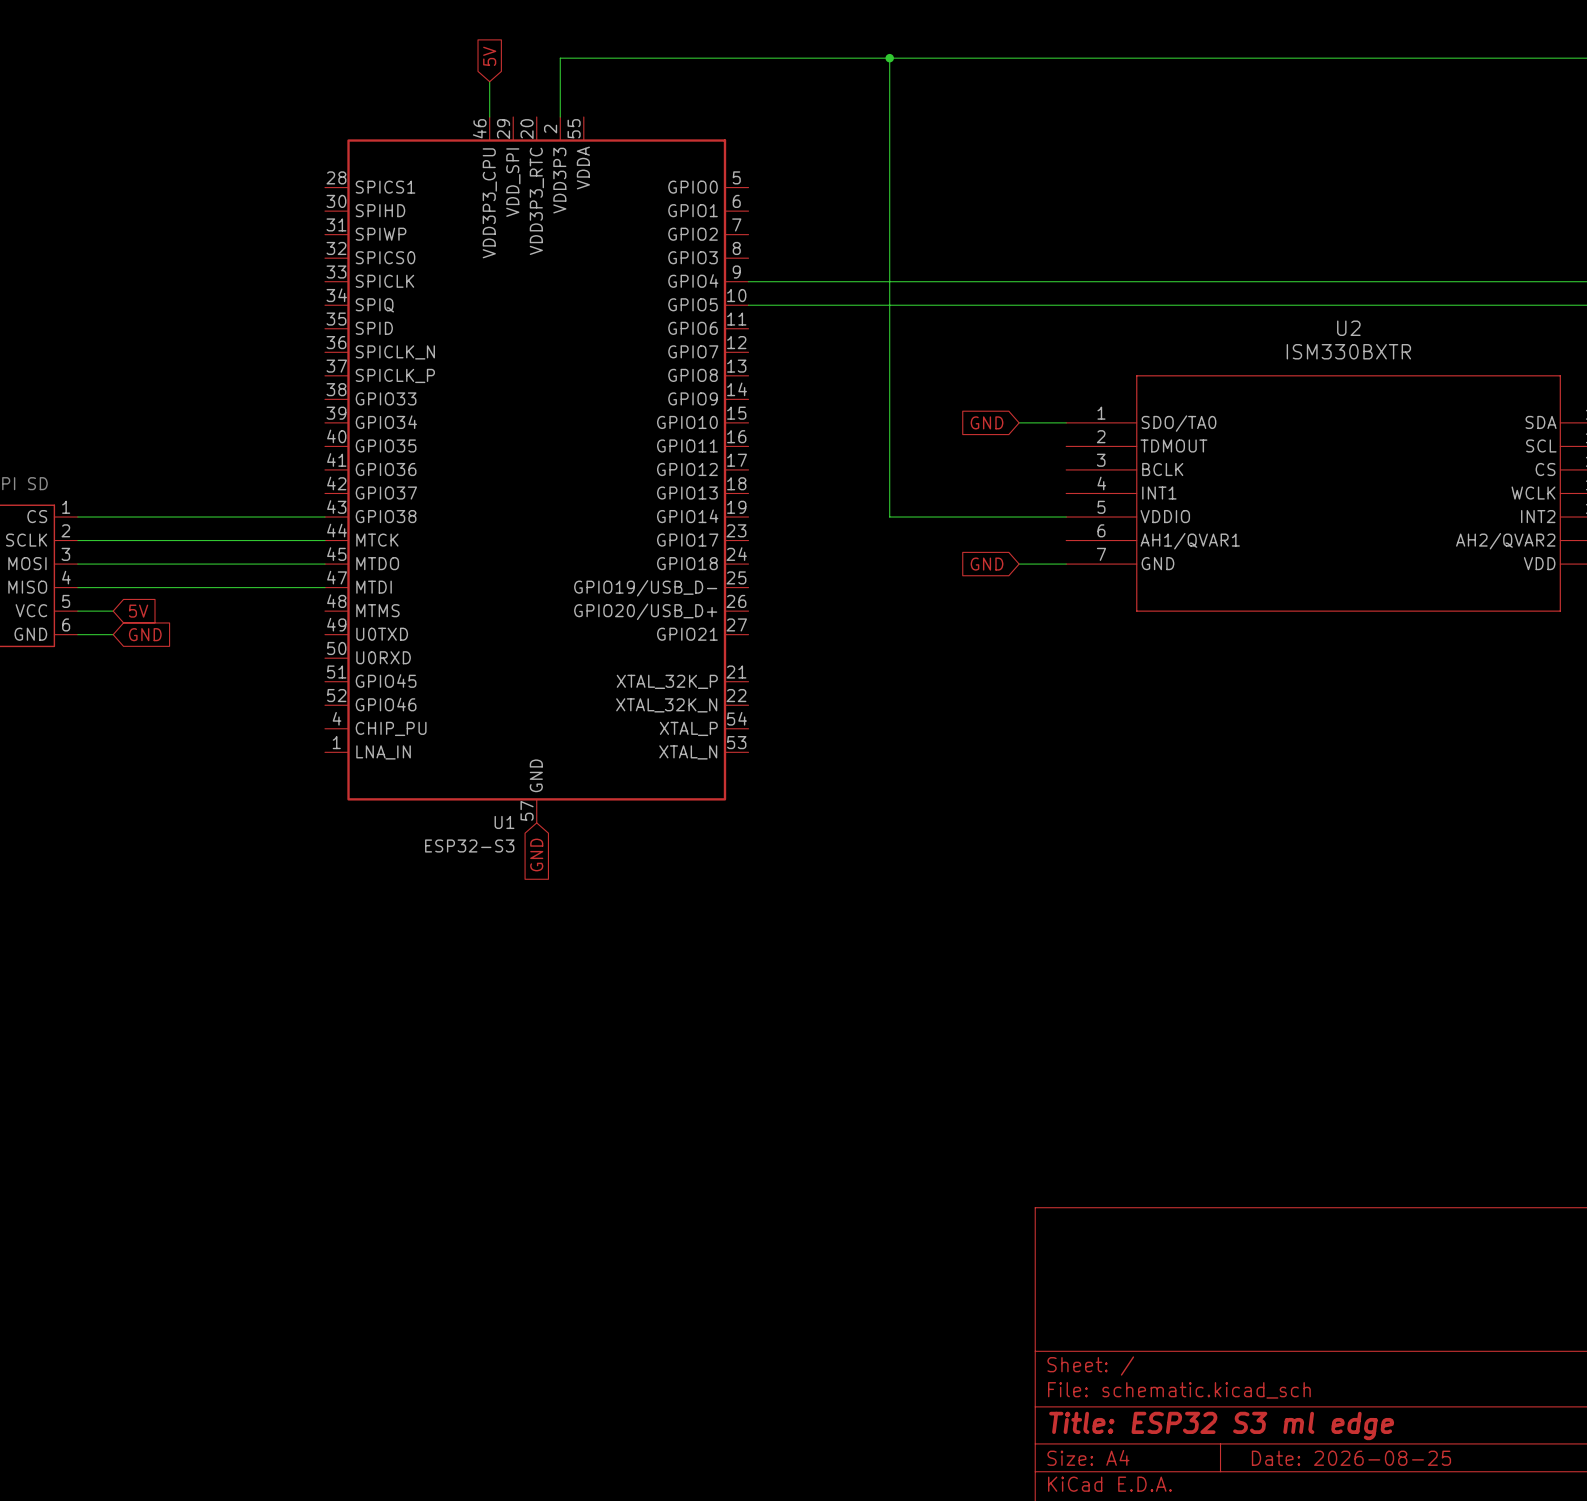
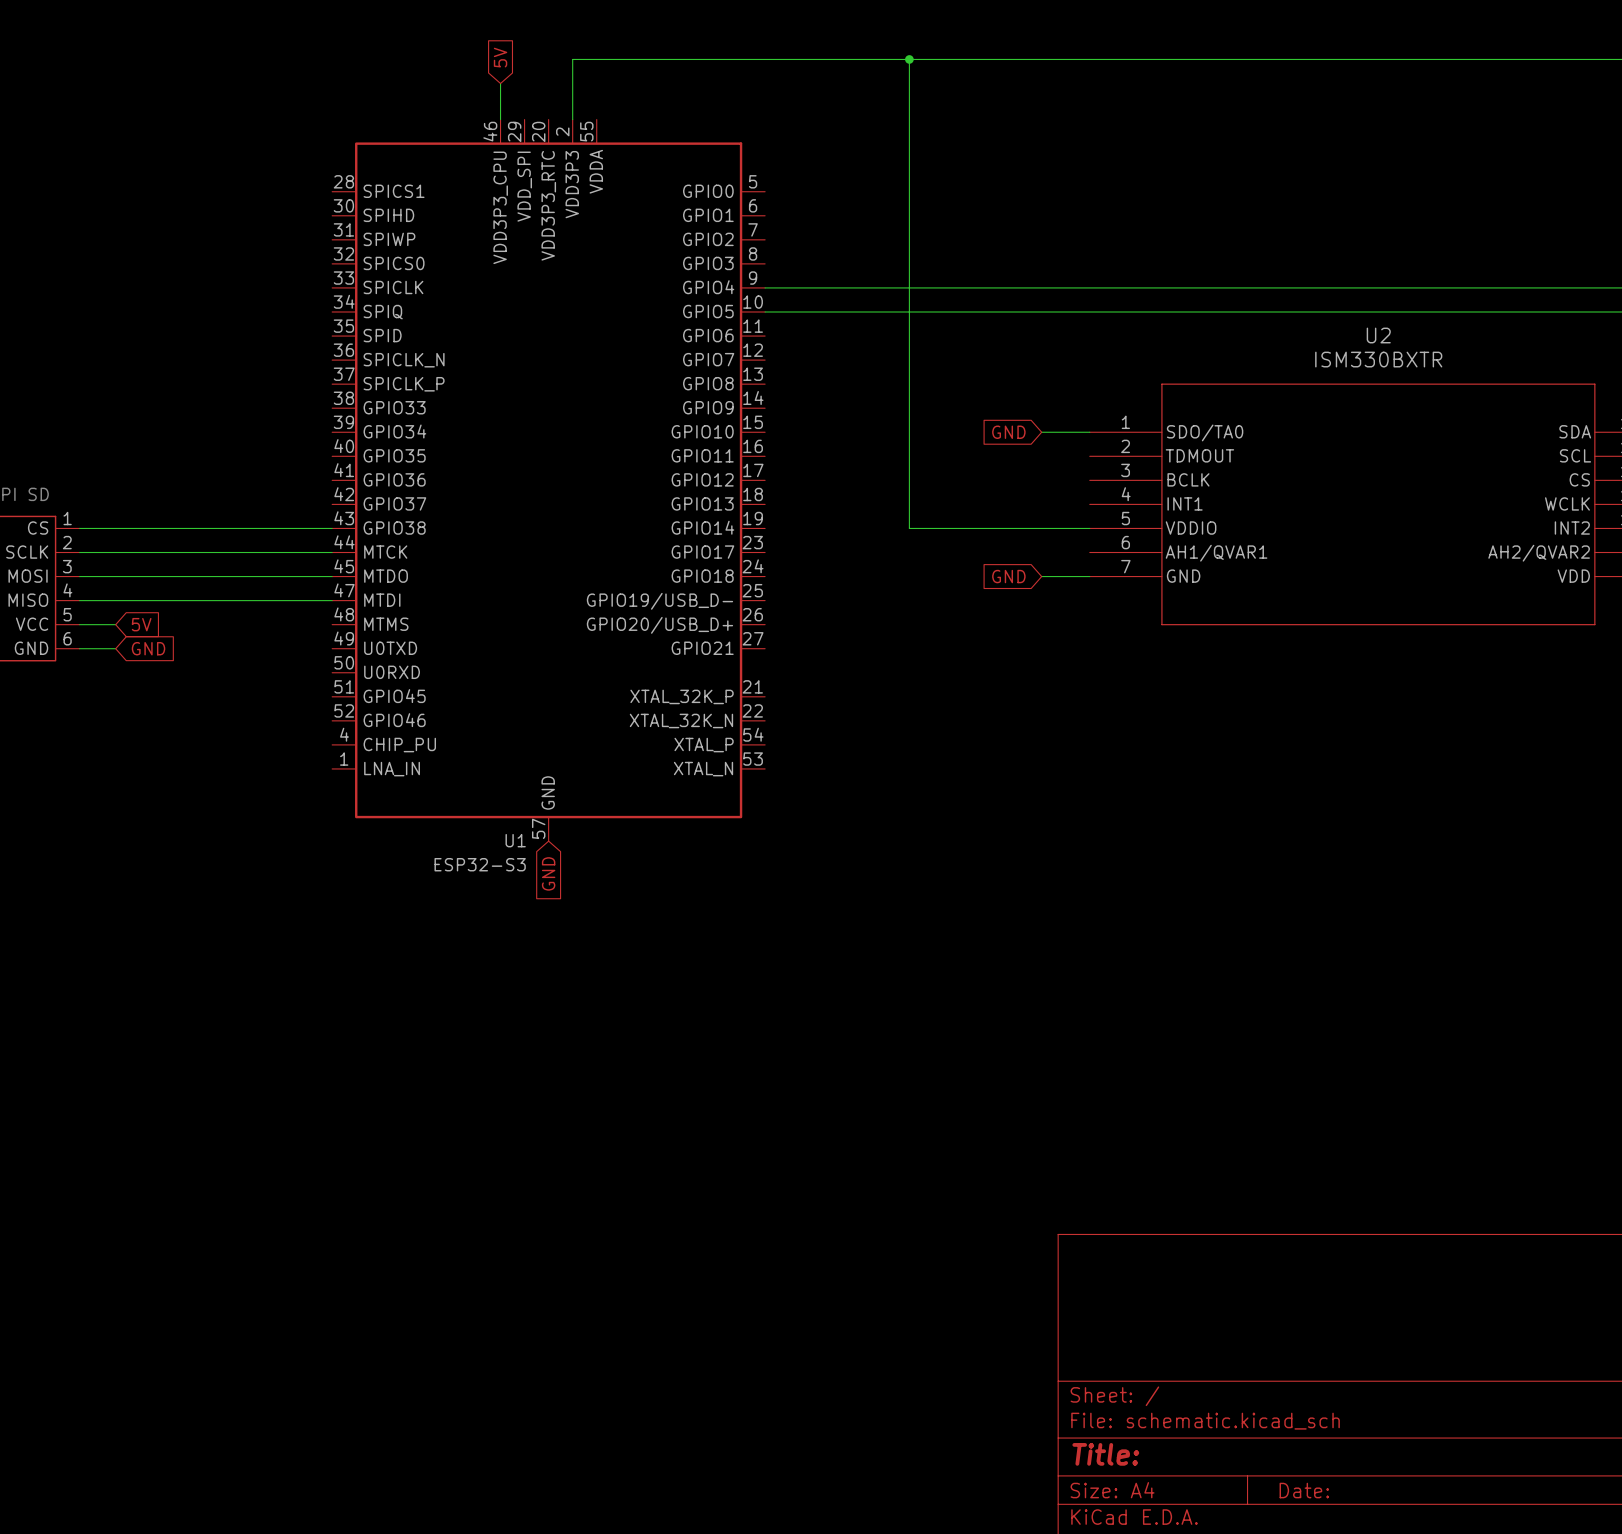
title block: Title: ESP32 S3 ml edge (1221, 1425) -> Title: (1105, 1454)
title block: Date: 2026-08-25 (1351, 1458) -> Date: (1304, 1490)

